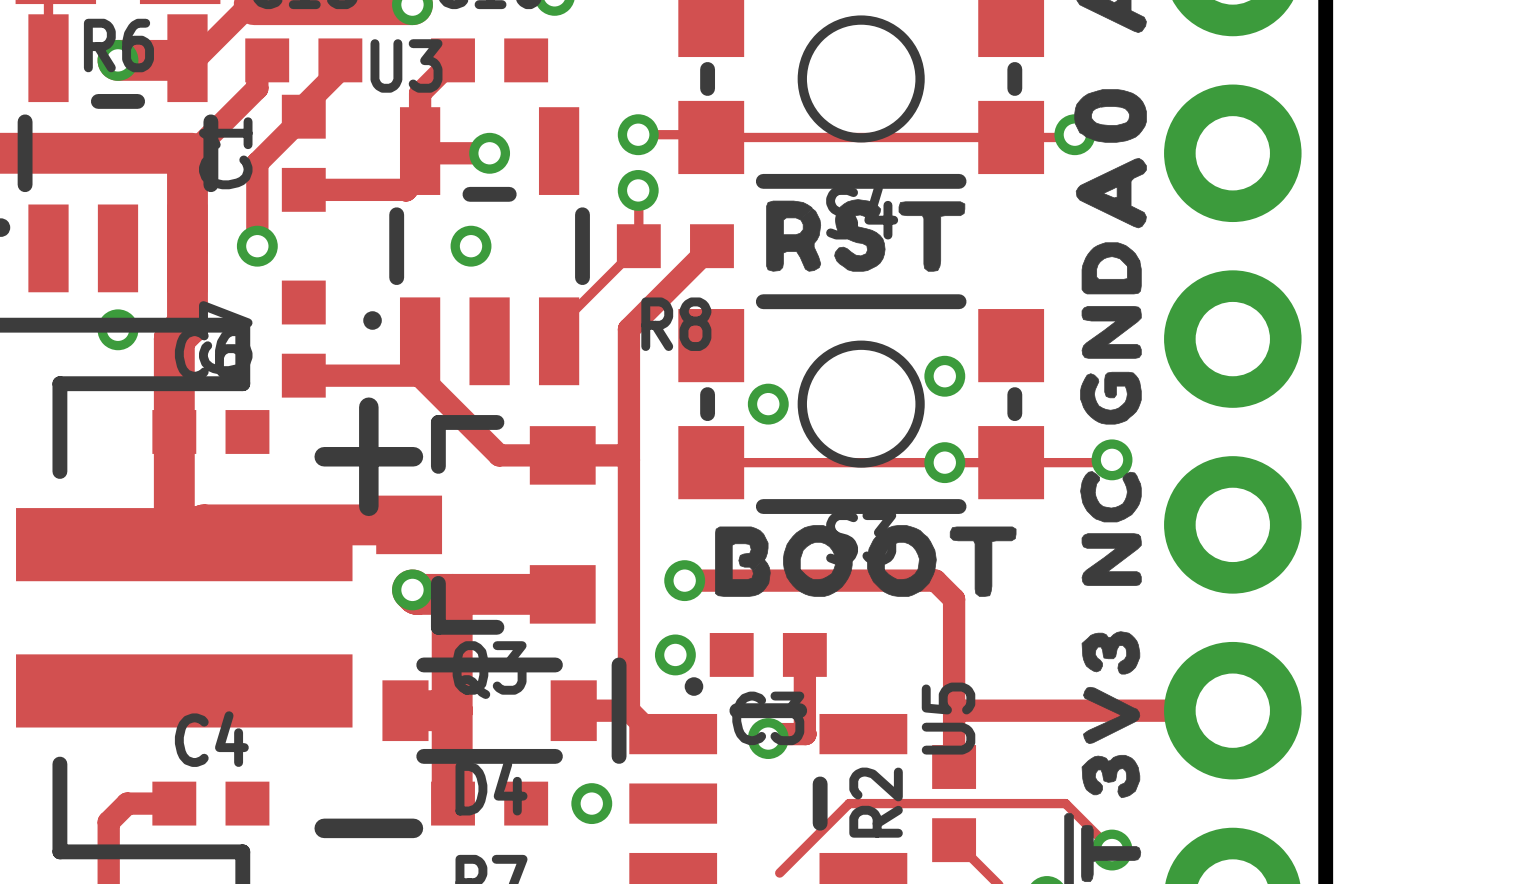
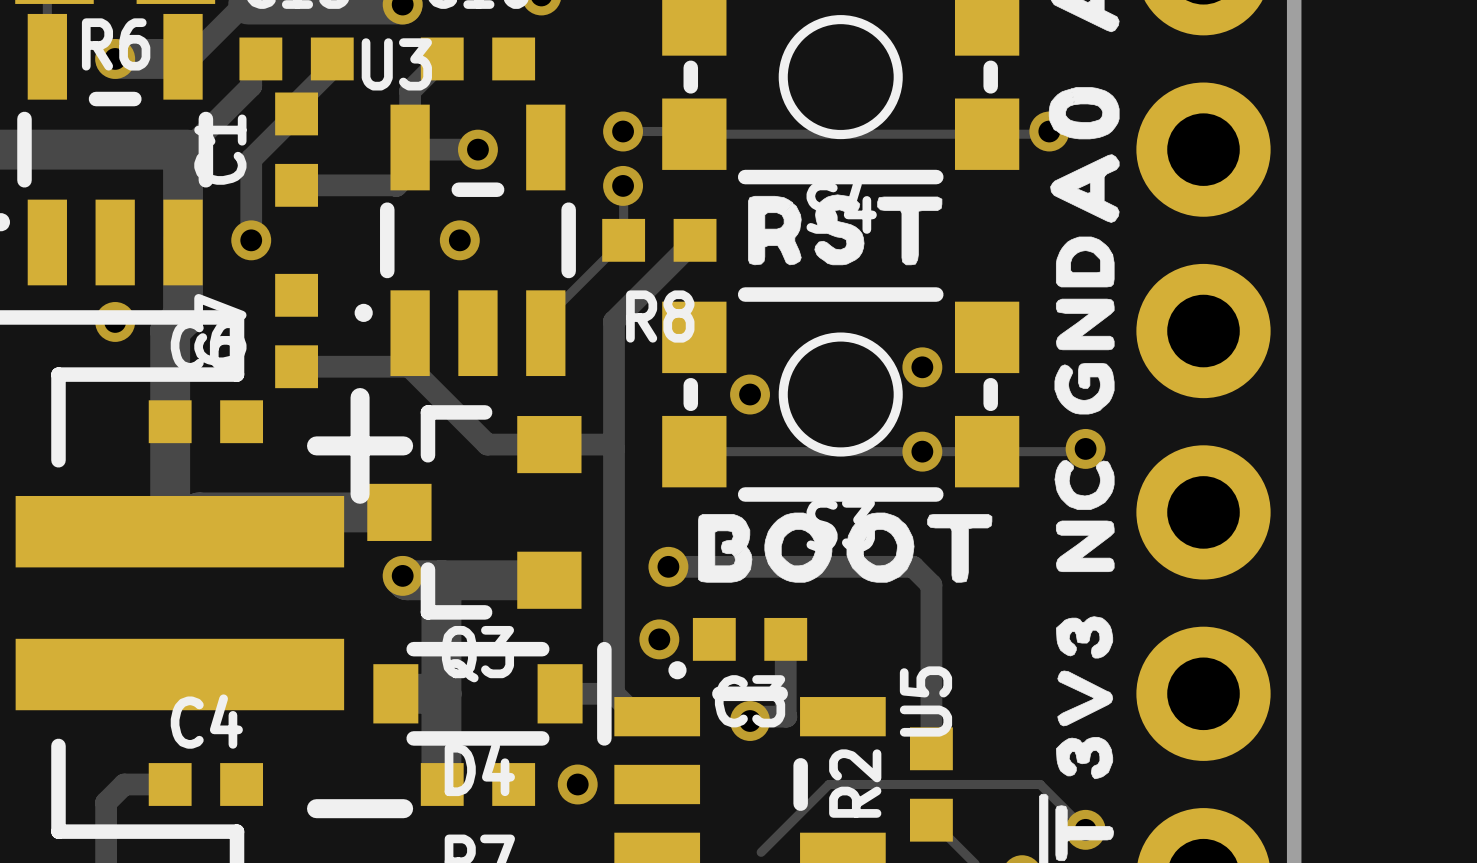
track: (954, 710) (1232, 710) -> none

